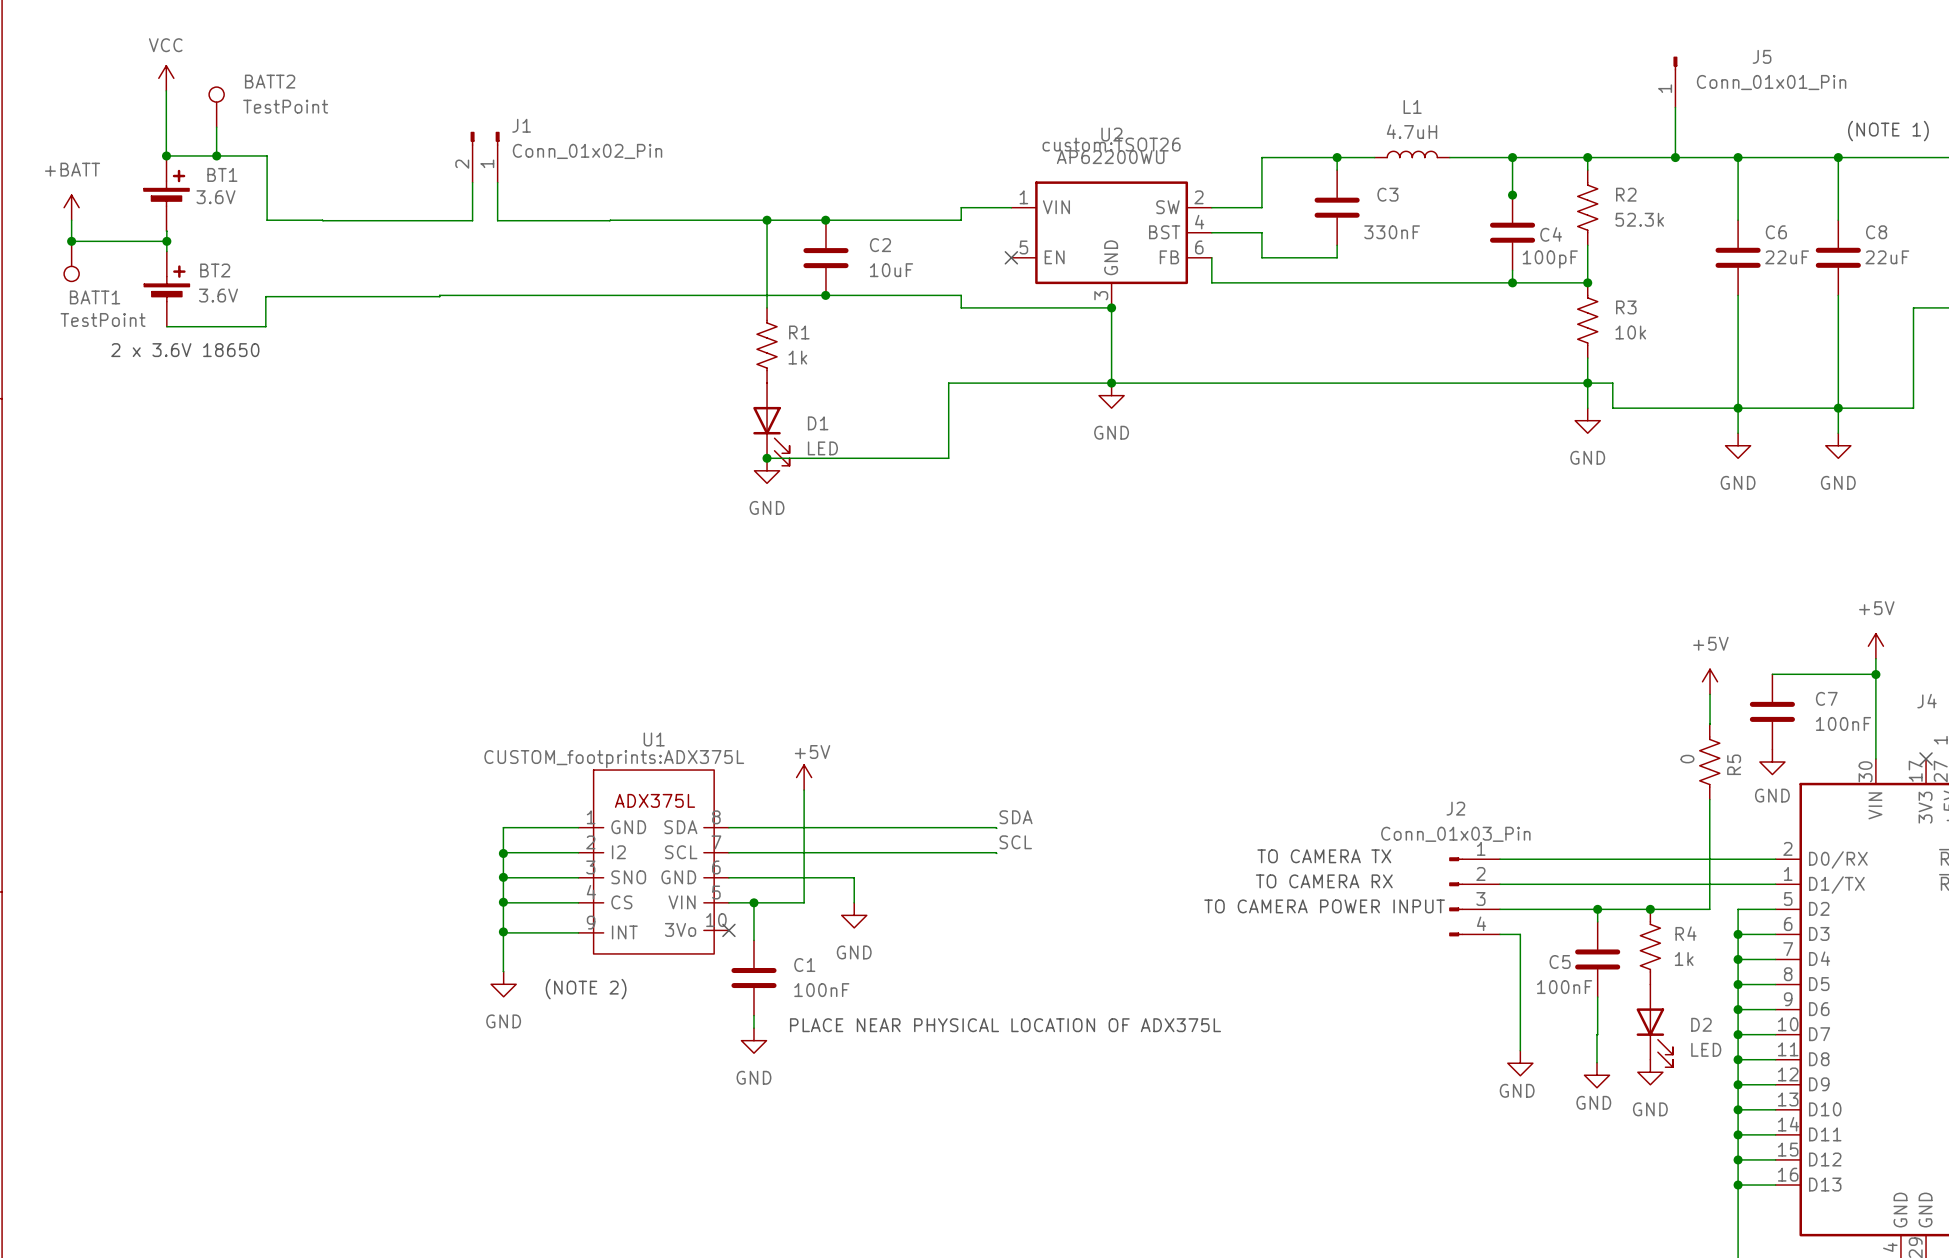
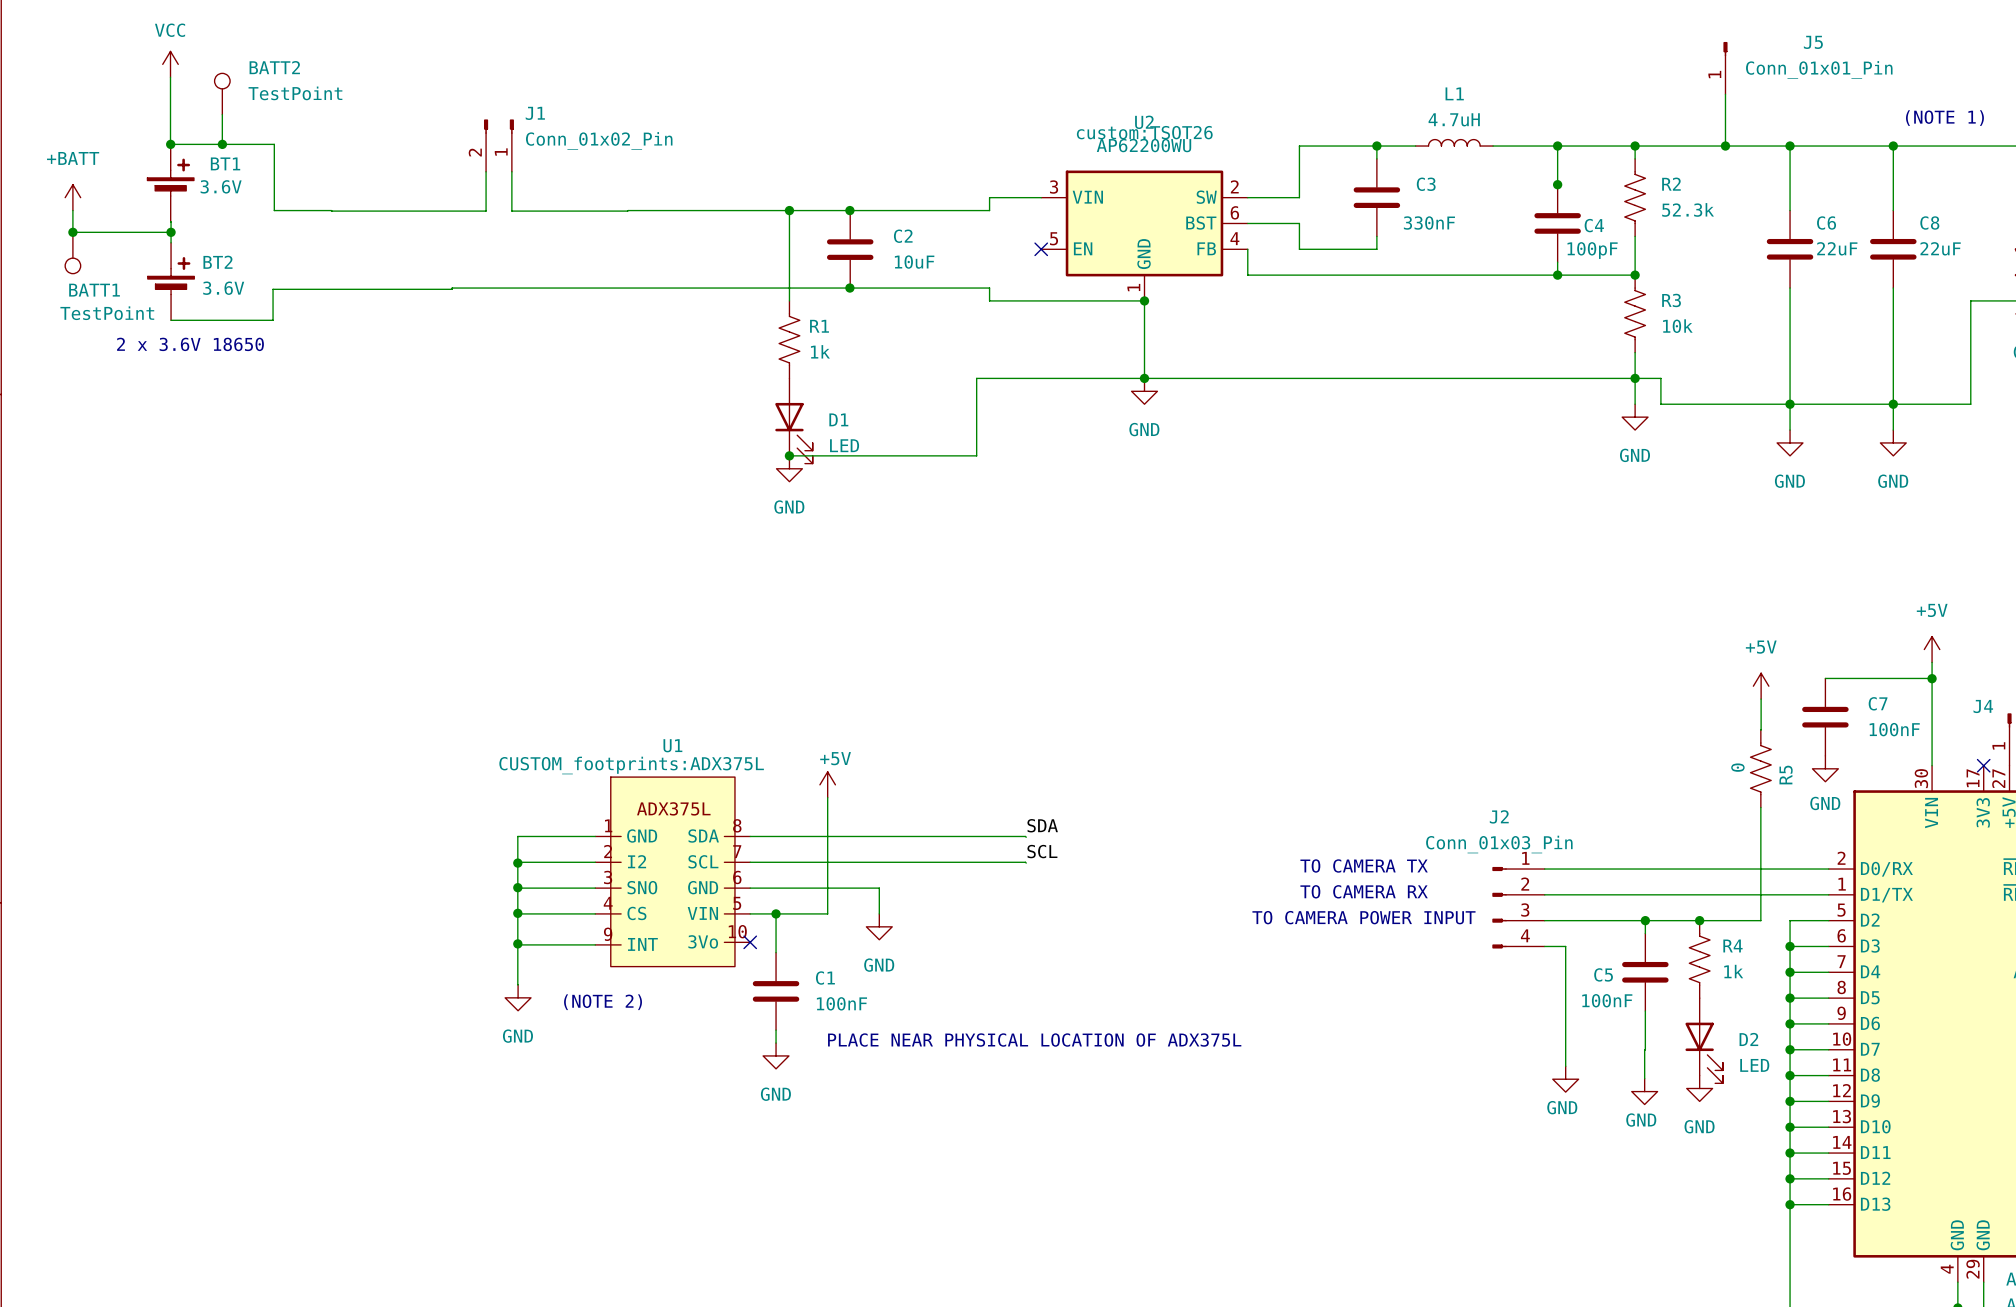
U2 pin number: 1 (1023, 197) -> 3 (1054, 187)
U2 pin number: 4 (1199, 222) -> 6 (1234, 212)
U2 pin number: 6 (1199, 247) -> 4 (1234, 238)
U2 pin number: 3 (1101, 295) -> 1 (1133, 287)

